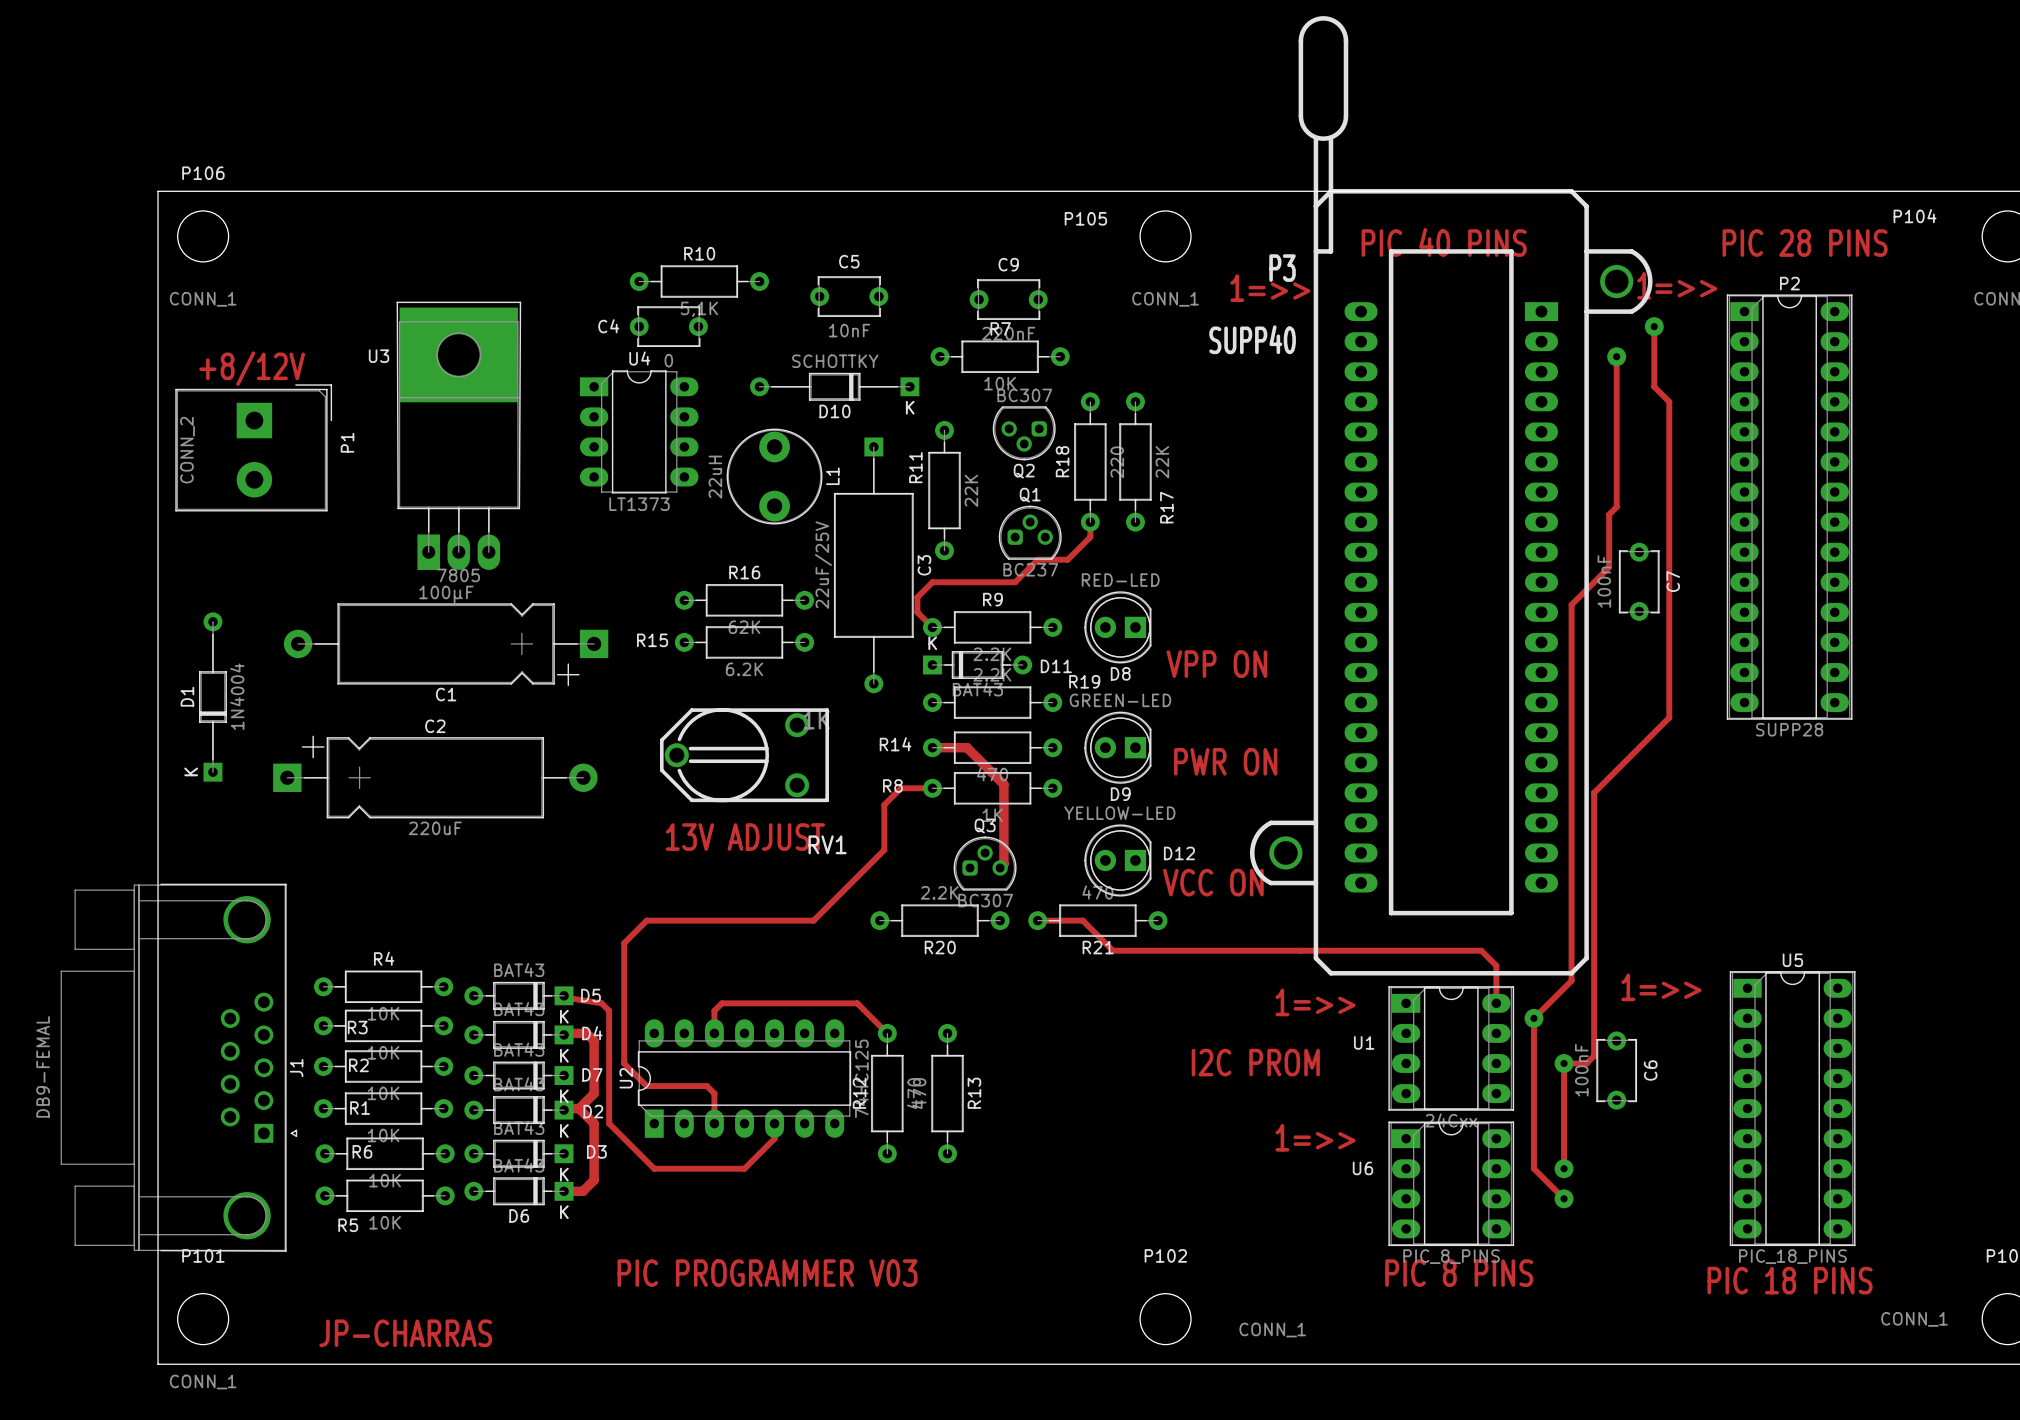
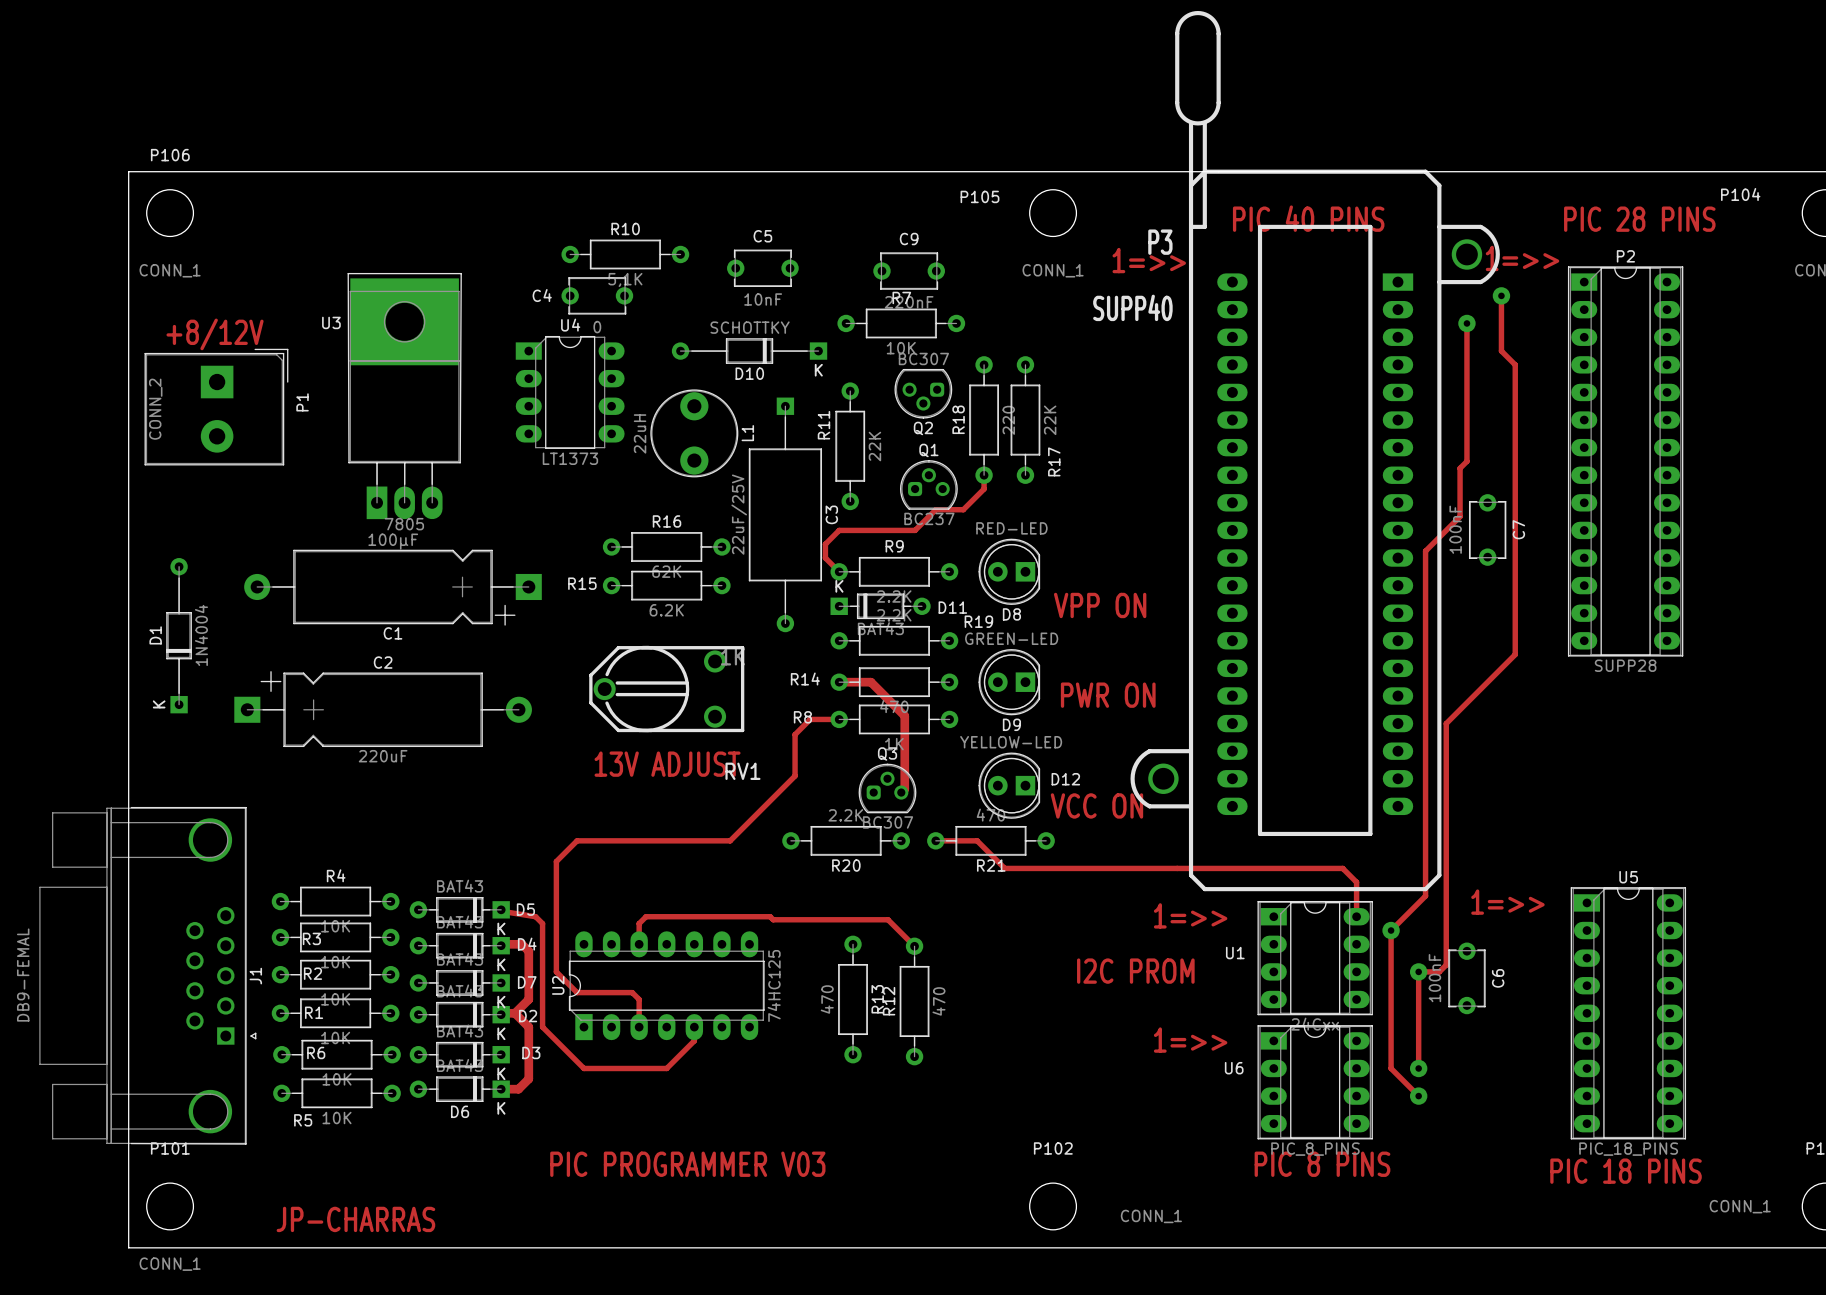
track: (860, 1006) (887, 1033) -> (773, 919) (888, 919) (914, 946)
R12 position: (887, 1093) -> (914, 1001)

